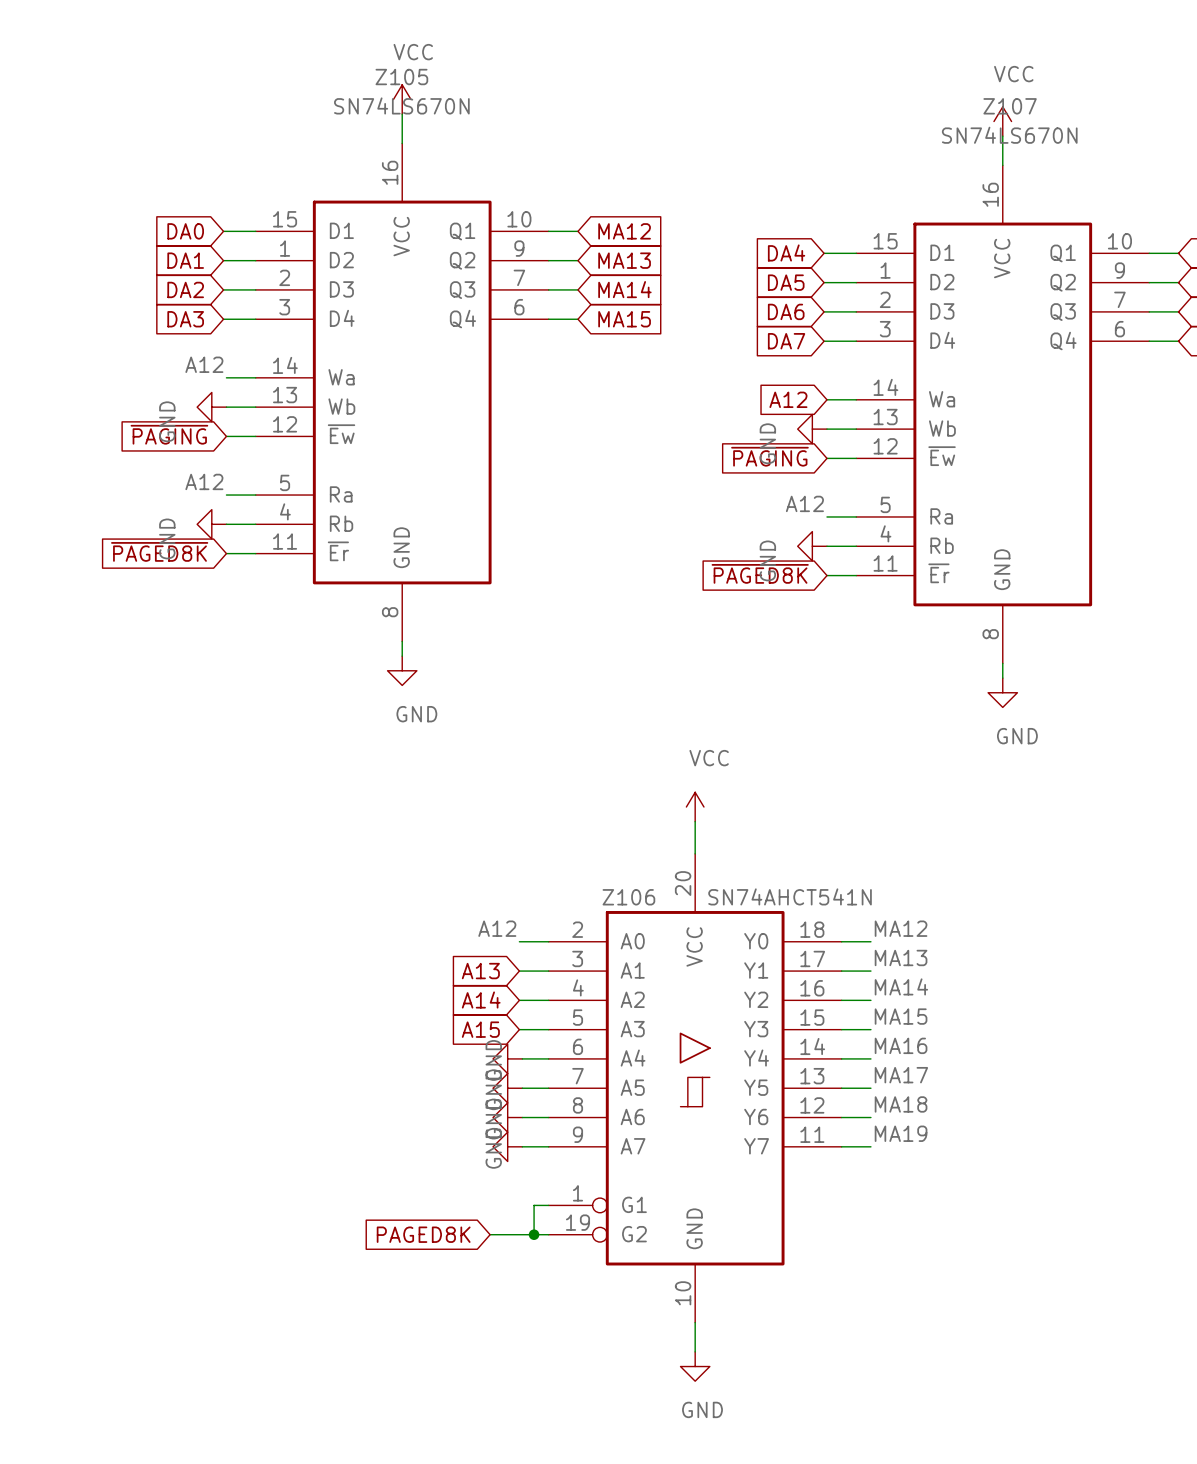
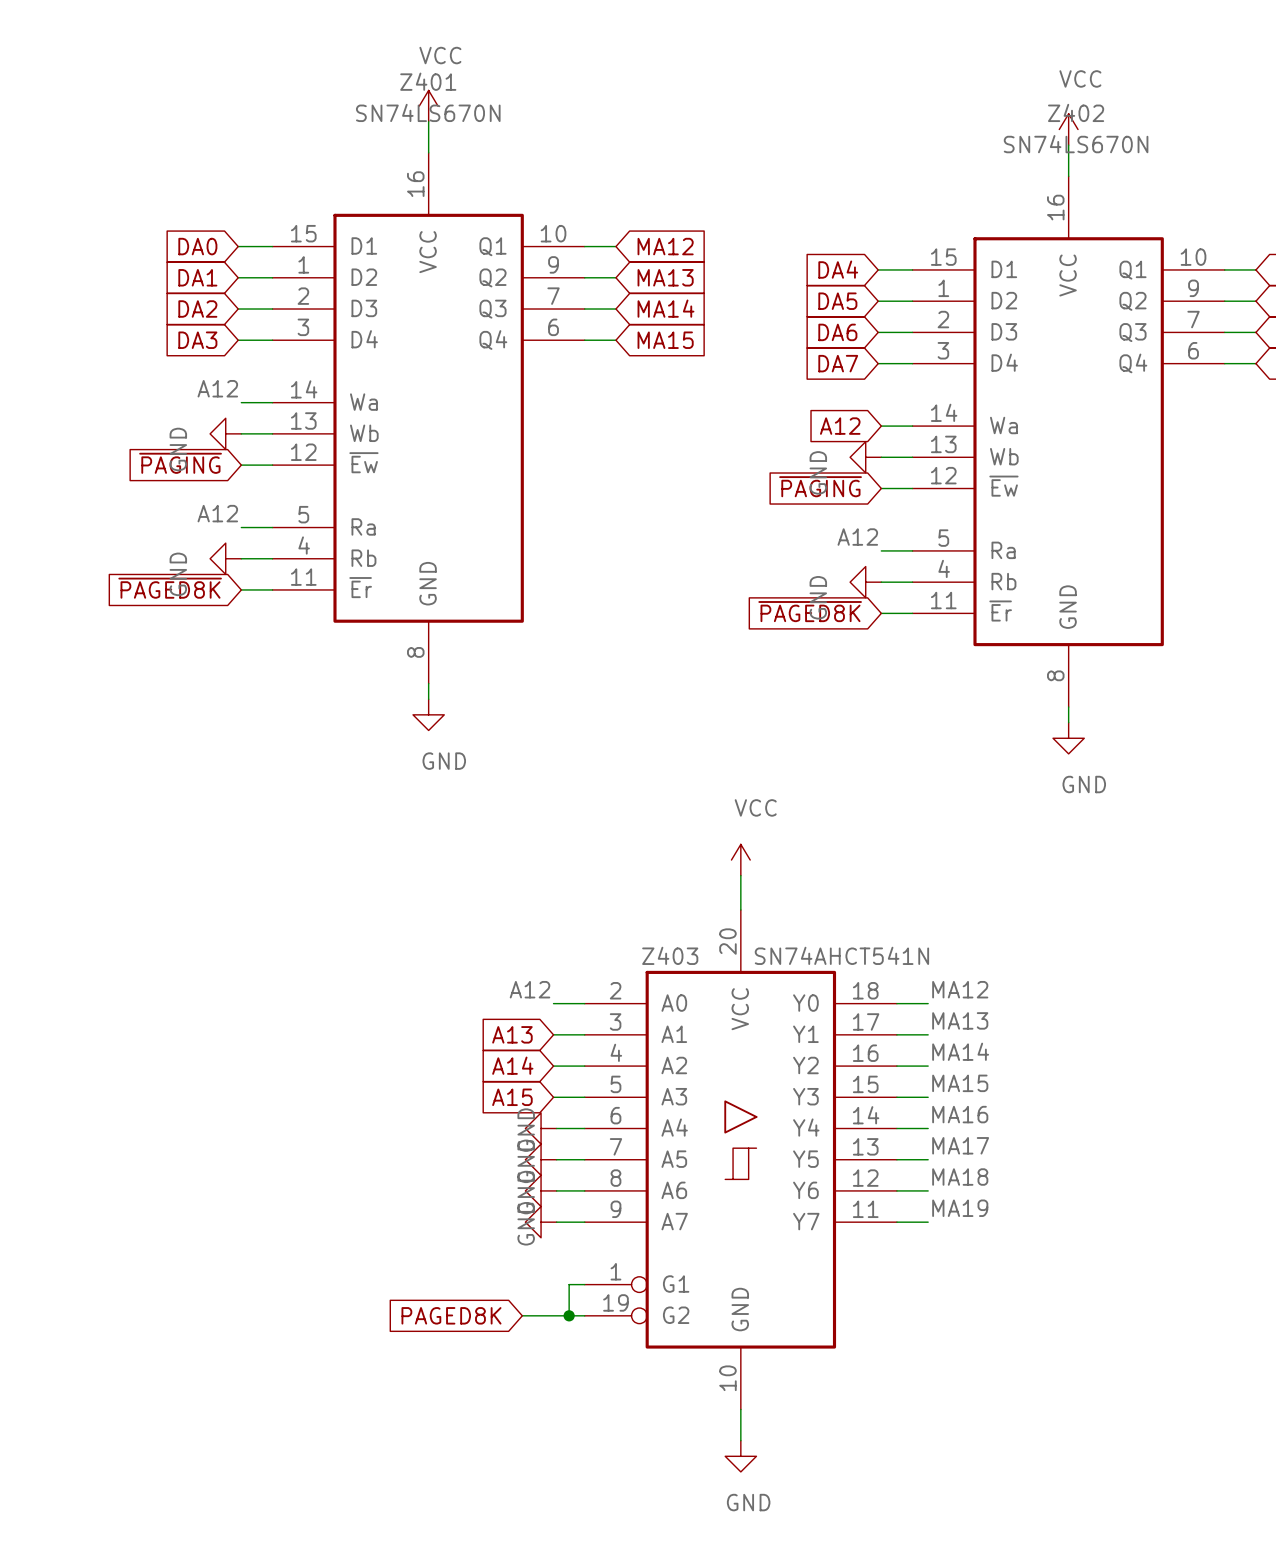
Z105 name: Z105 (401, 77) -> Z401 (428, 81)
Z107 name: Z107 (1010, 106) -> Z402 (1076, 112)
Z106 name: Z106 (628, 897) -> Z403 (670, 955)

